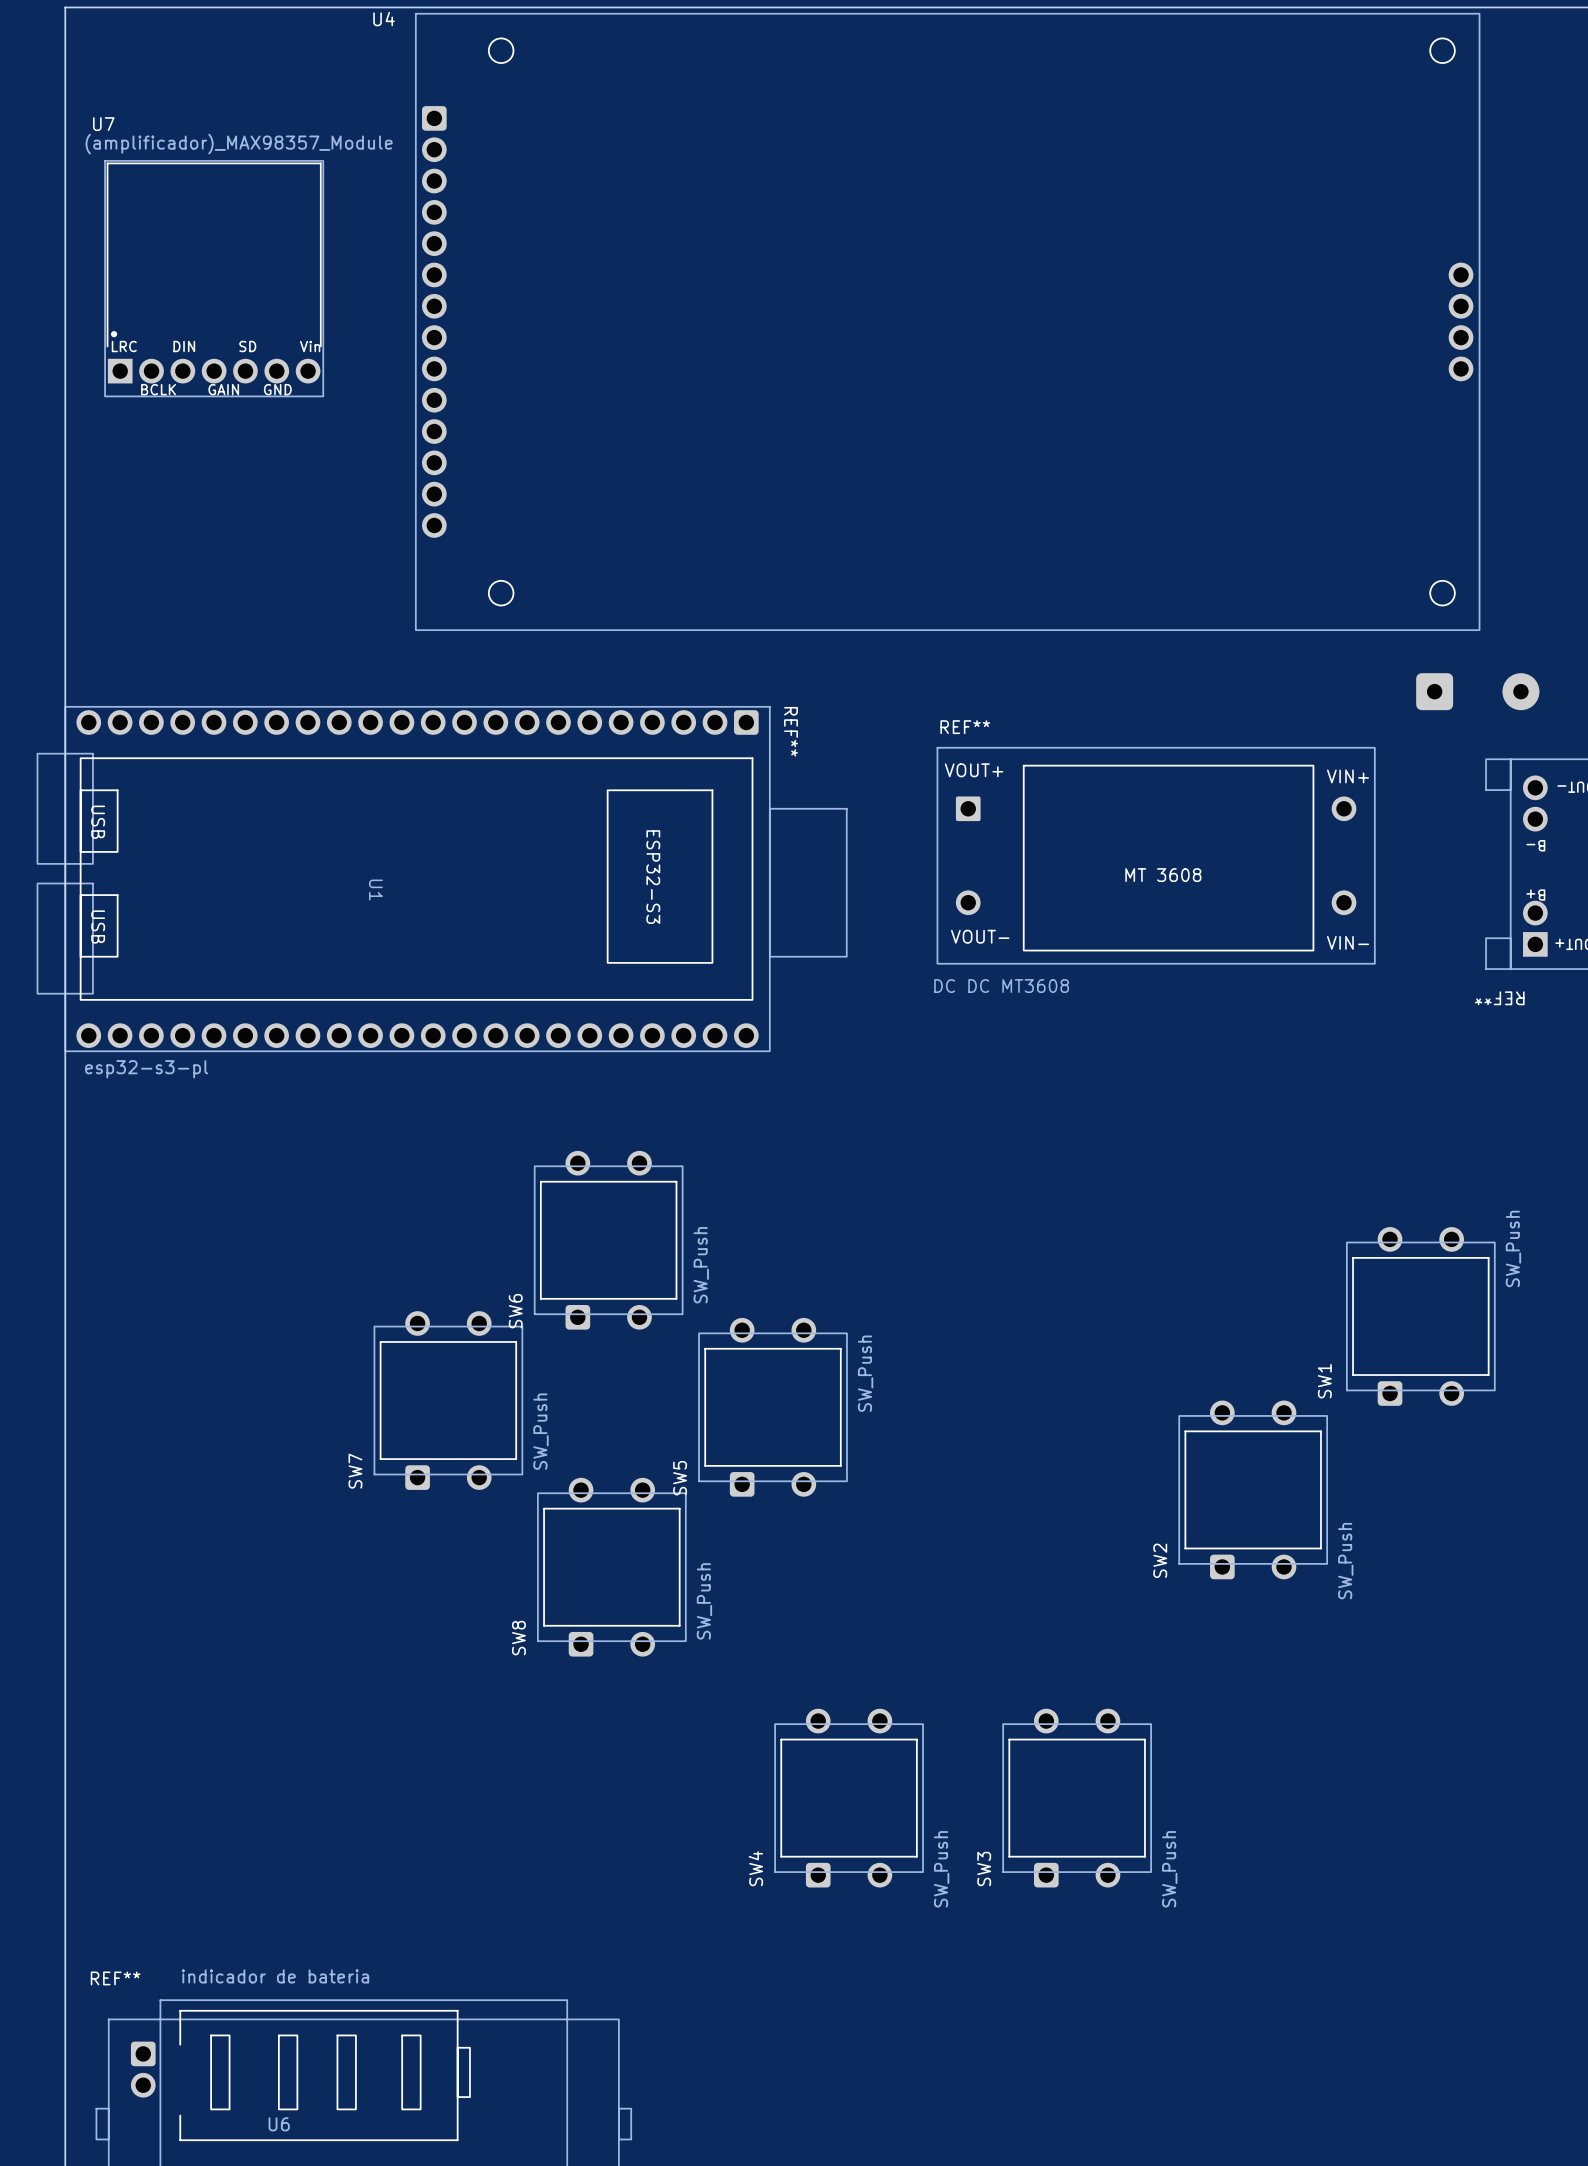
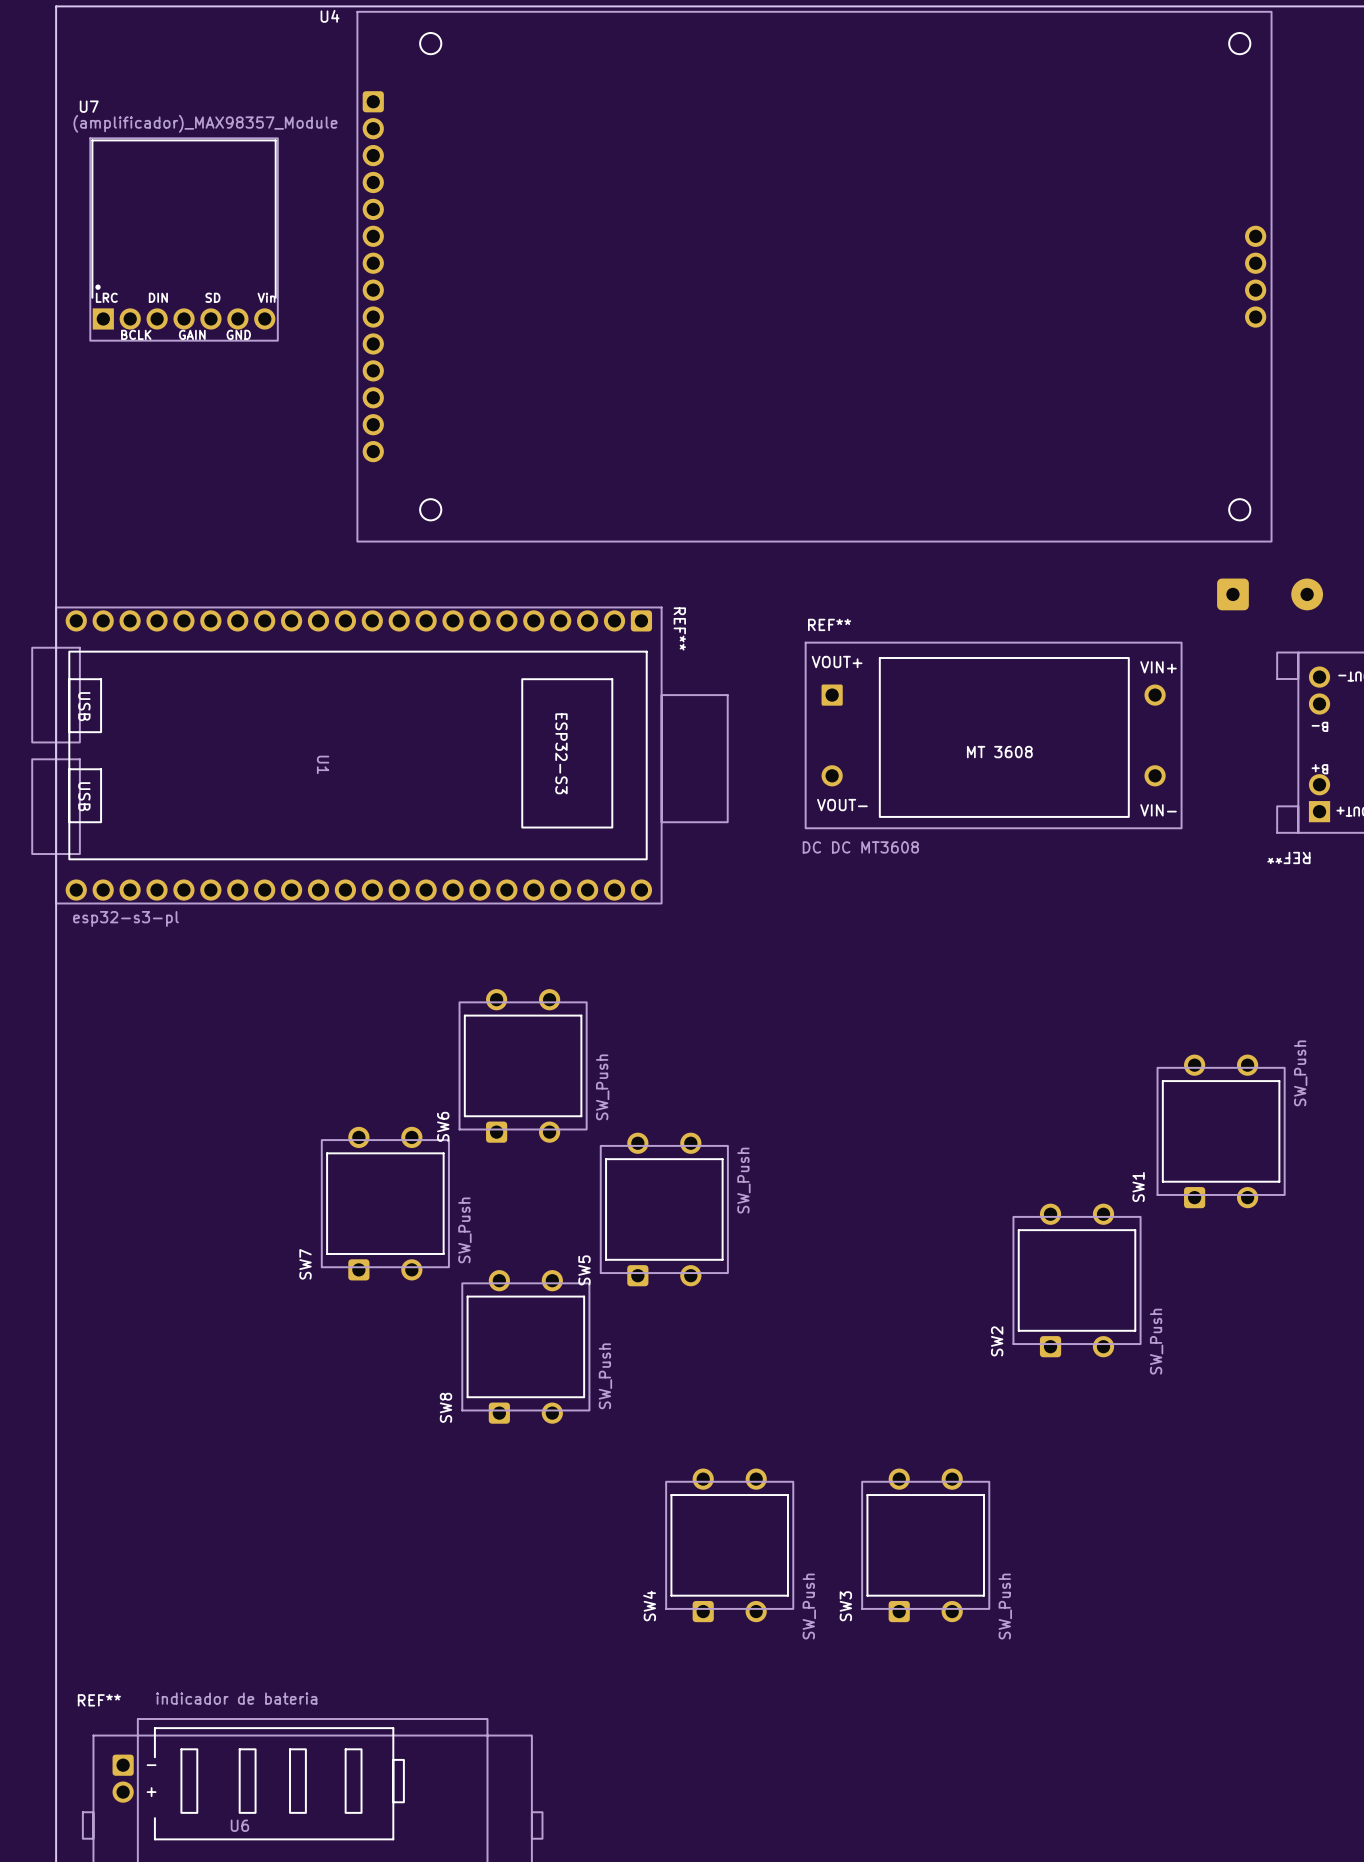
U6 text: none -> - (151, 1765)
U6 text: none -> + (151, 1792)

